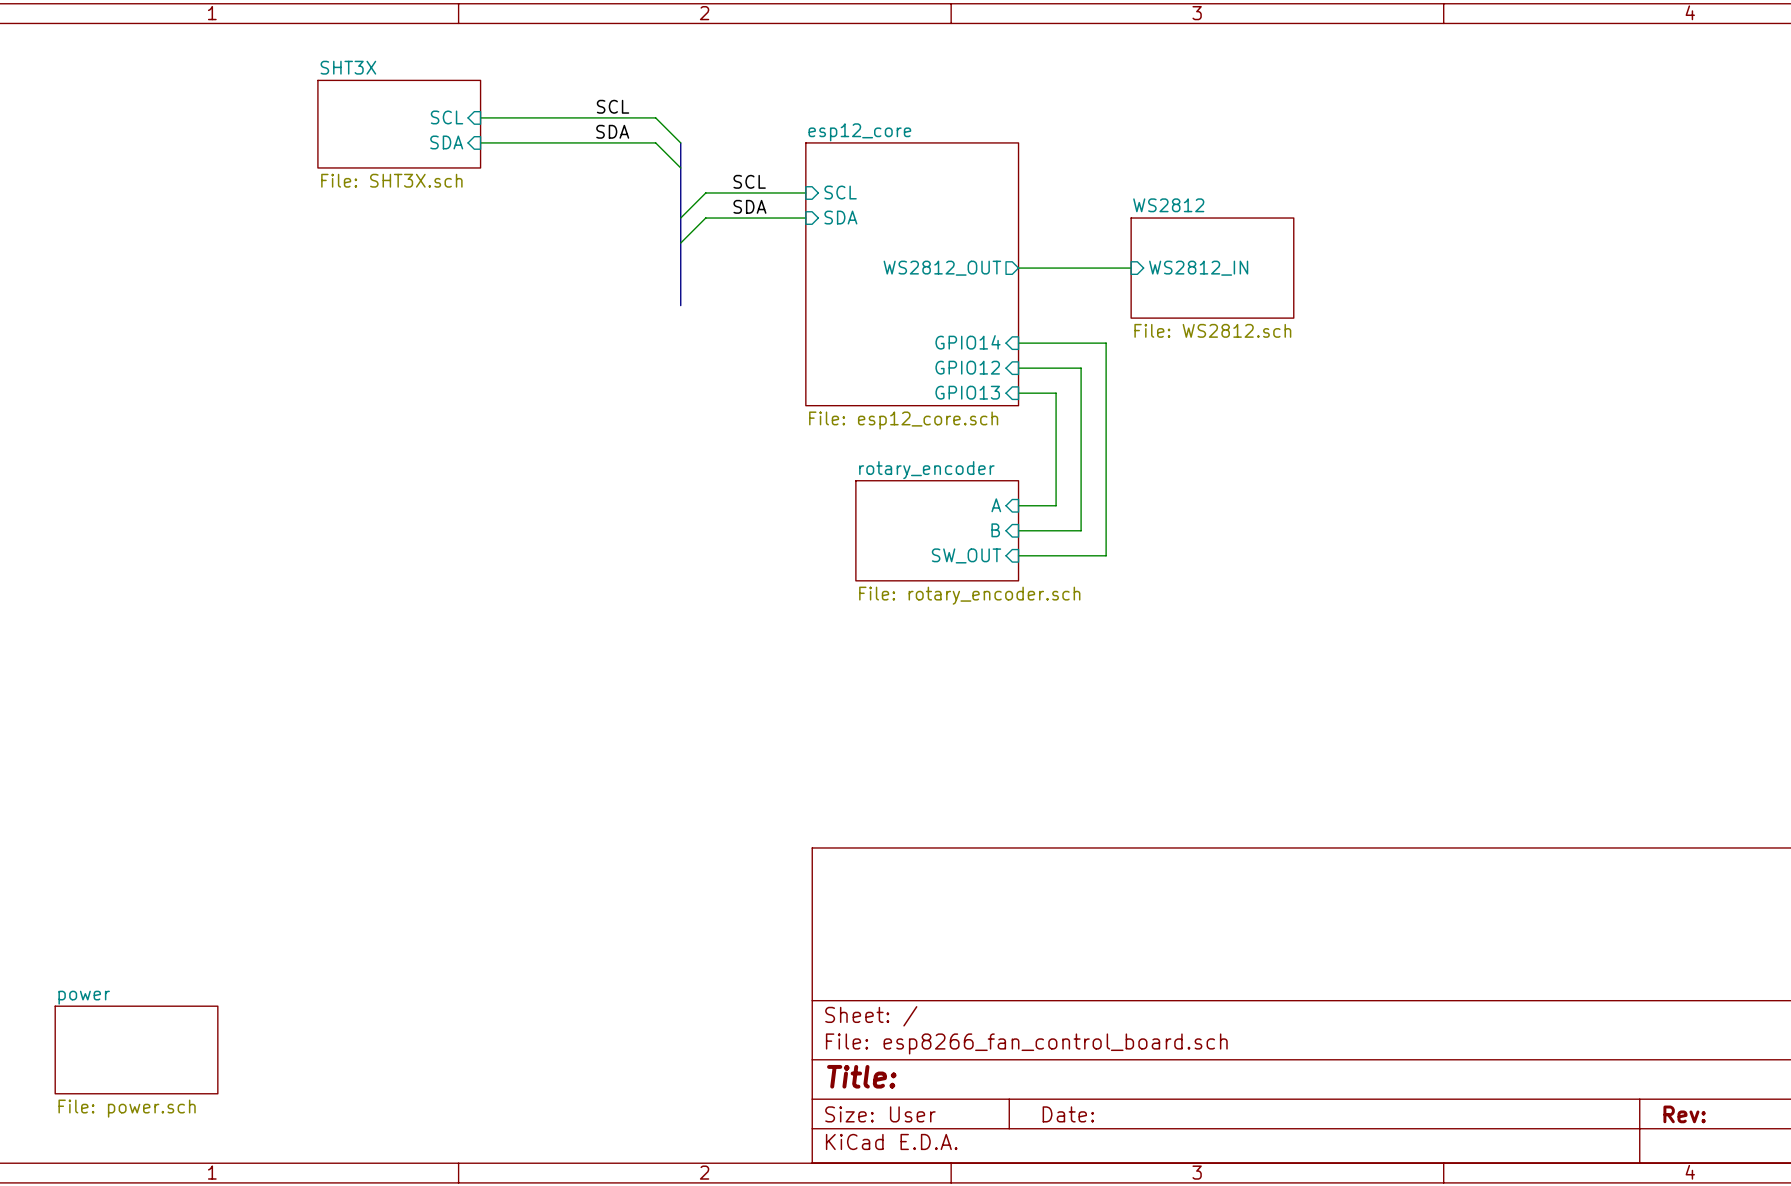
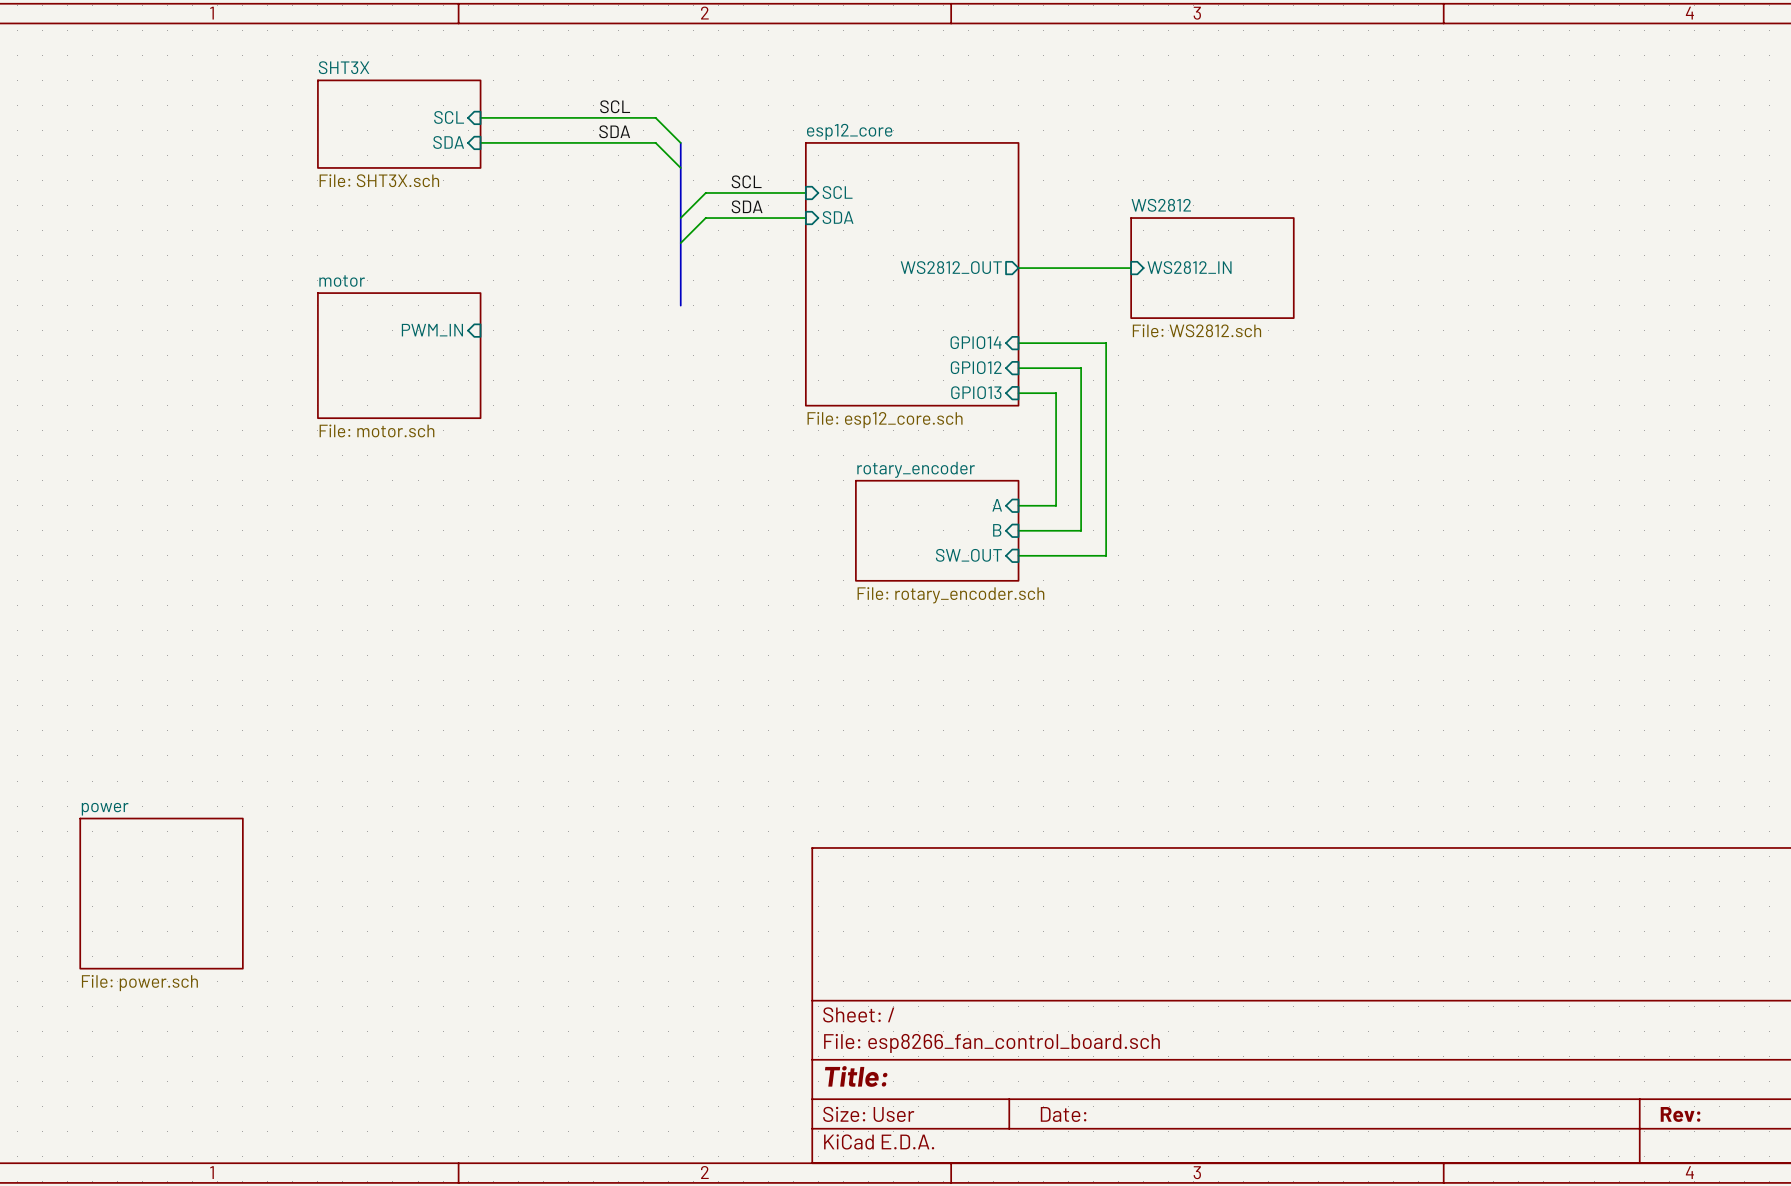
sheet pin: none -> PWM_IN (432, 330)
sheet motor: none -> File: motor.sch (399, 355)
sheet power: none -> File: power.sch (161, 893)
sheet power: File: power.sch (136, 1049) -> none

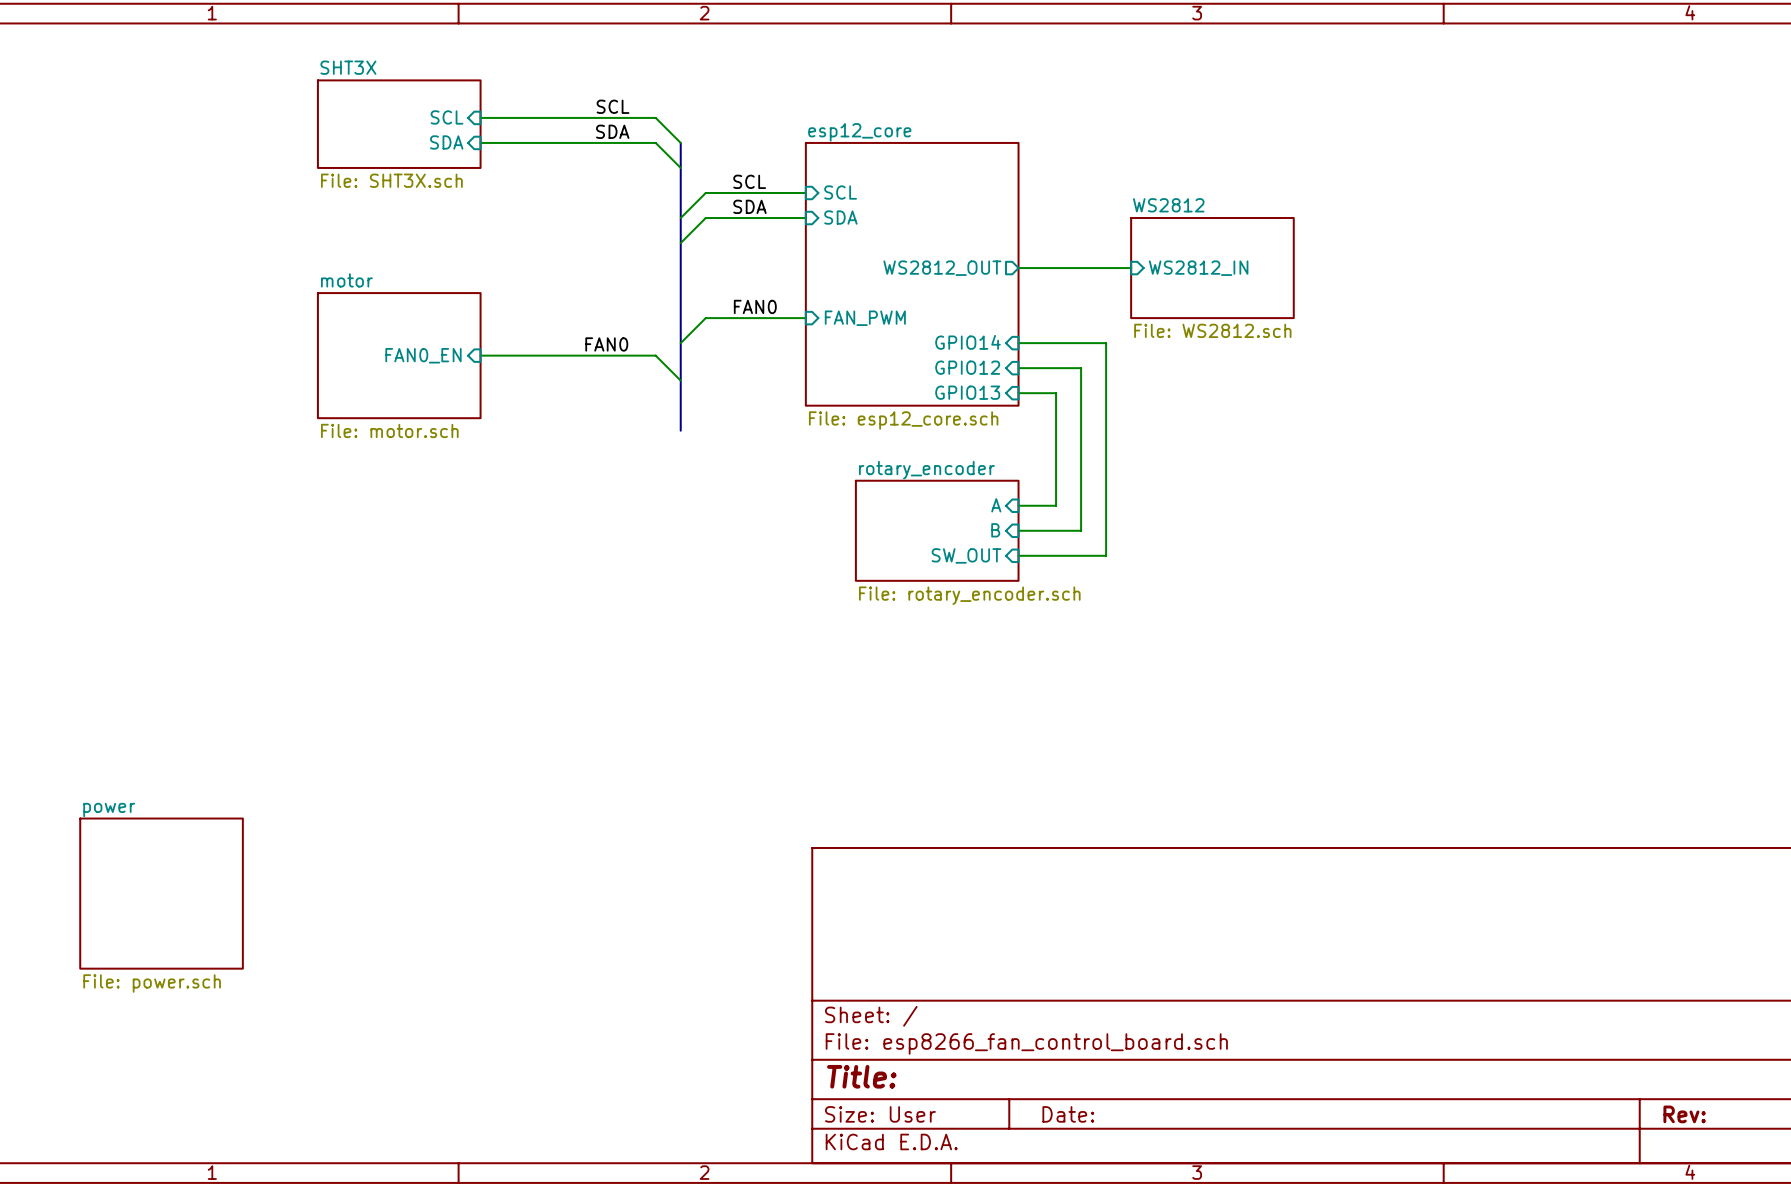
bus: none -> (680, 305) (680, 430)
label: none -> FAN0 (755, 306)
sheet pin: none -> FAN_PWM (865, 318)
wire: none -> (805, 318) (705, 318) (680, 343)
sheet pin: PWM_IN (432, 330) -> none
label: none -> FAN0 (606, 344)
sheet pin: none -> FAN0_EN (423, 355)
wire: none -> (480, 355) (655, 355) (680, 380)

